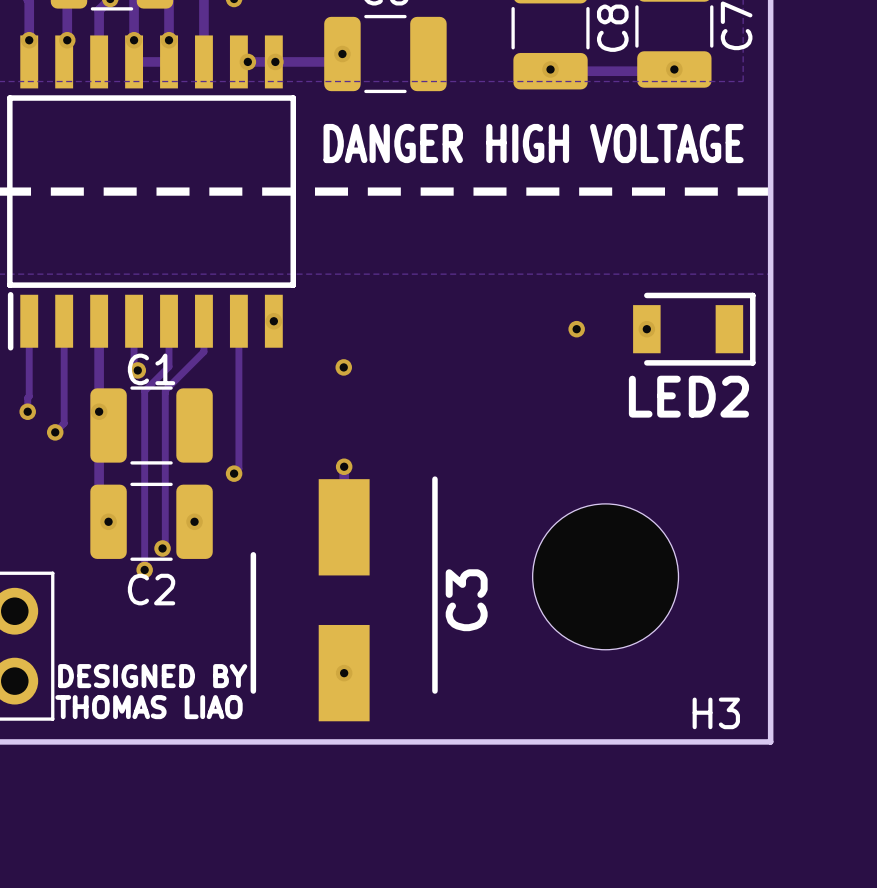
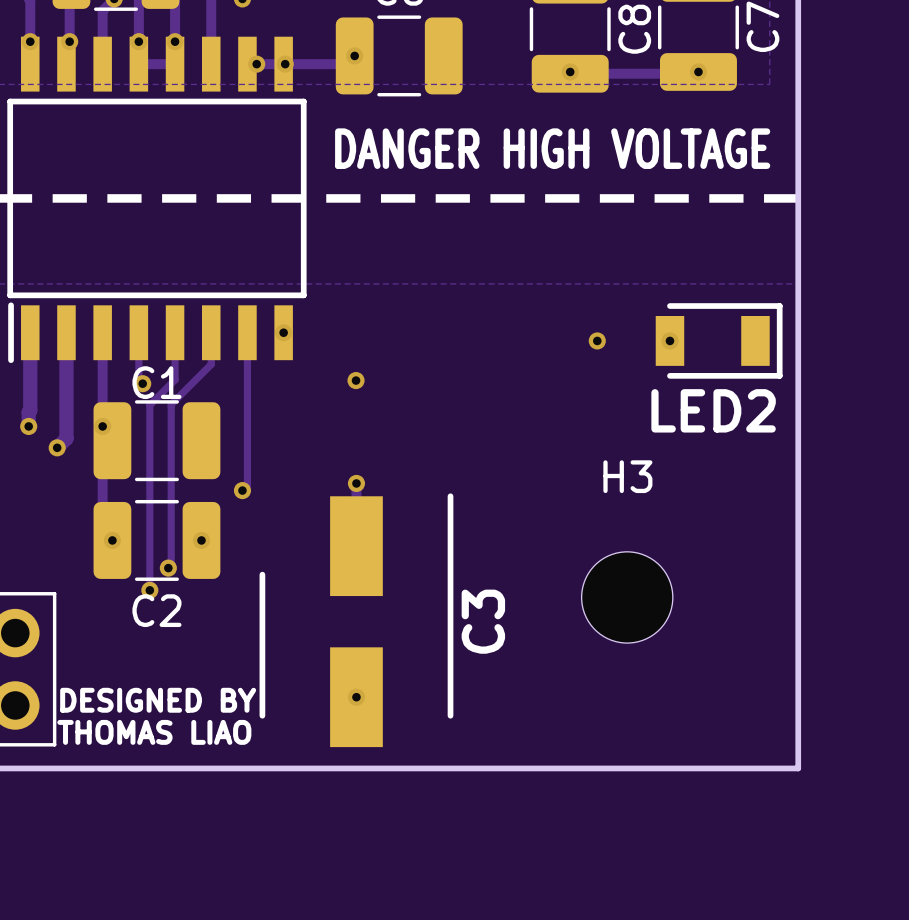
track width: thin (29, 321) (27, 411) -> thick (30, 332) (28, 426)
track width: thin (64, 321) (64, 423) (55, 432) -> thick (66, 332) (66, 438) (57, 447)
H3 footprint: [532, 503, 679, 650] -> [581, 551, 673, 644]
H3 name position: H3 (716, 713) -> H3 (627, 476)

